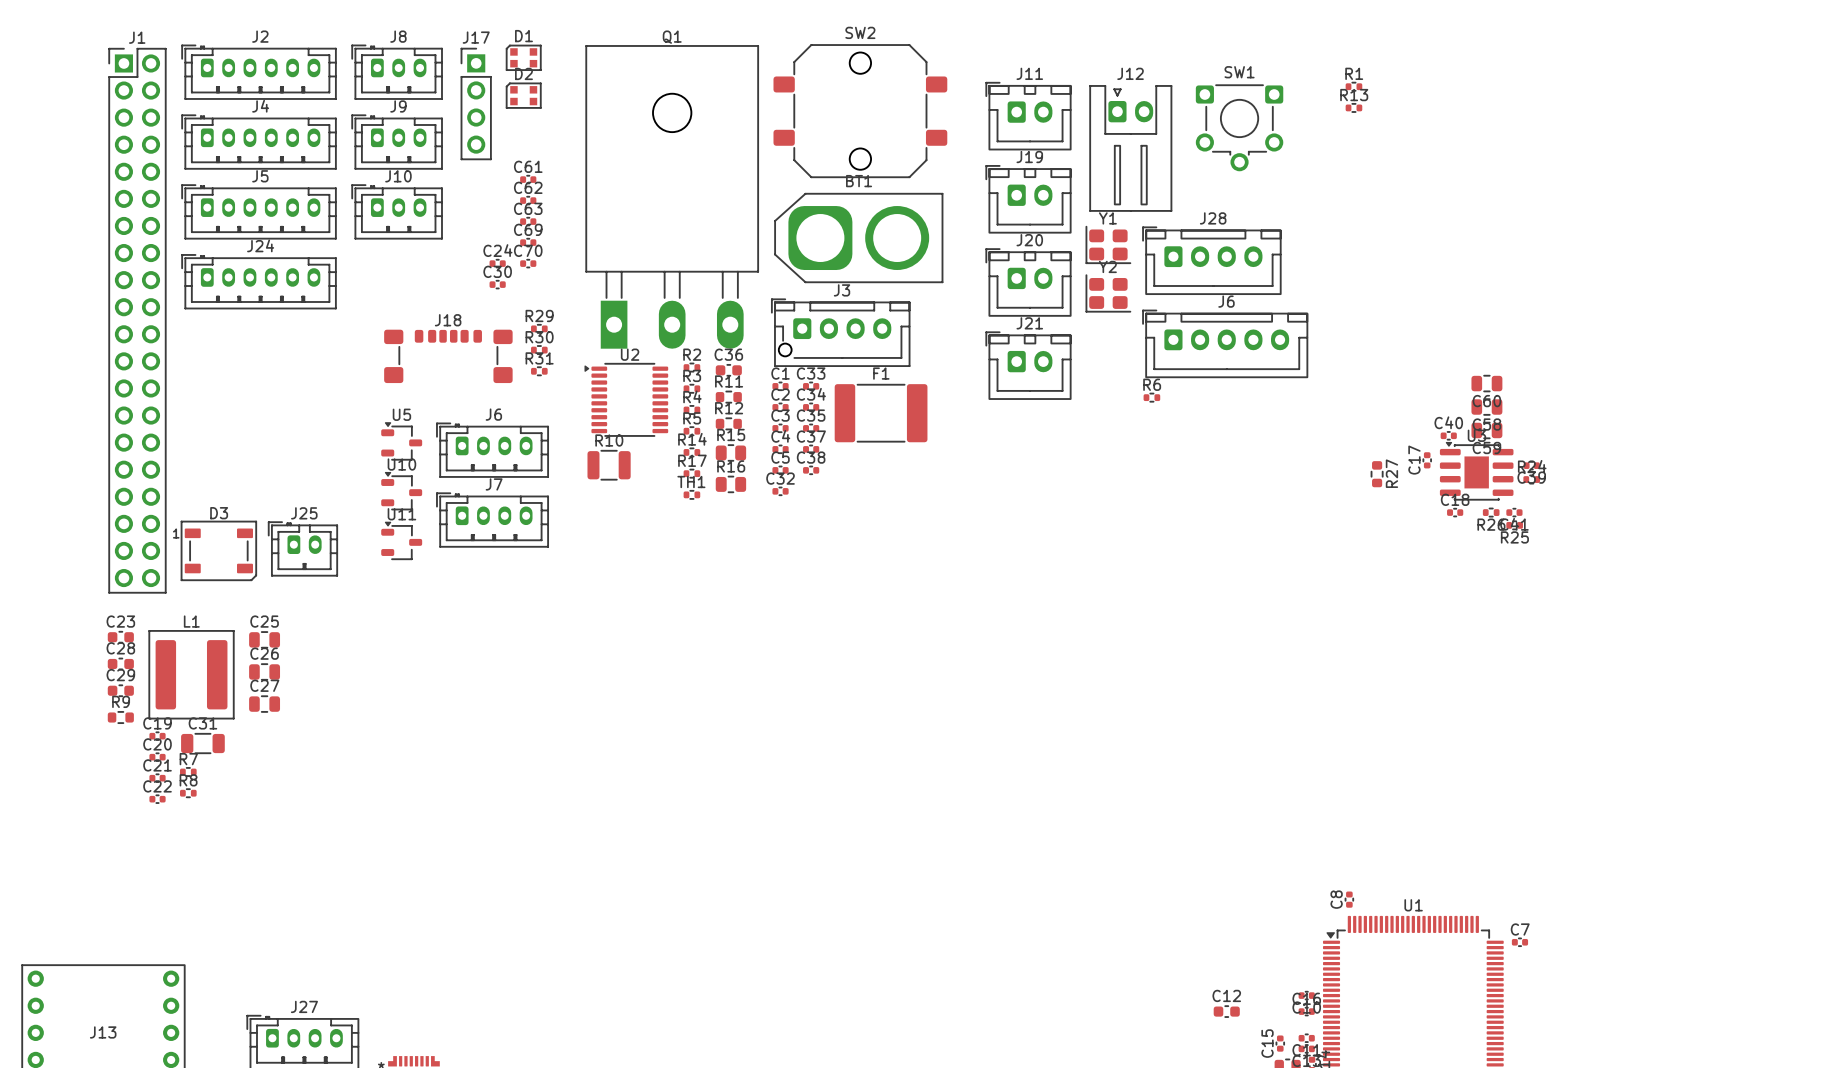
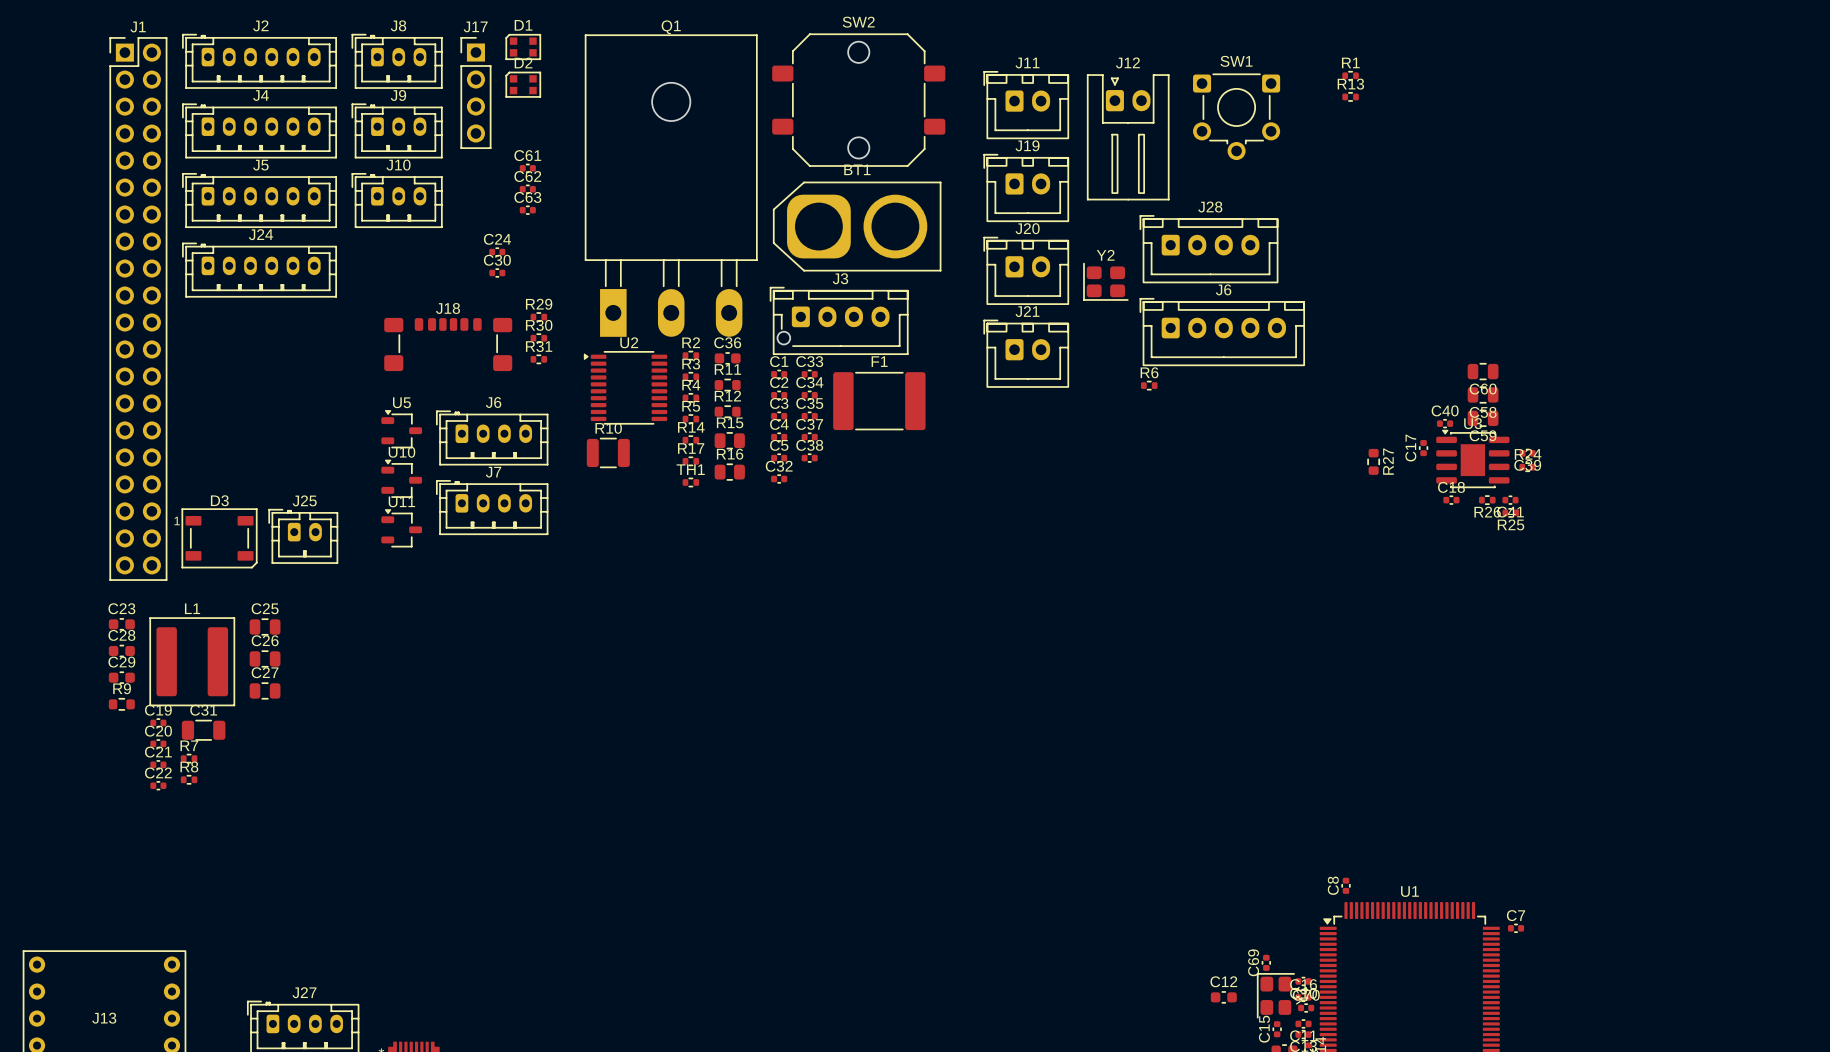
C69 rotation: 0° (528, 242) -> 90° clockwise (1266, 962)
C69 position: (528, 242) -> (1266, 962)
Y1 rotation: 0° (1108, 244) -> 90° clockwise (1275, 995)
Y1 position: (1108, 244) -> (1275, 995)
C70 position: (528, 263) -> (1306, 1007)

